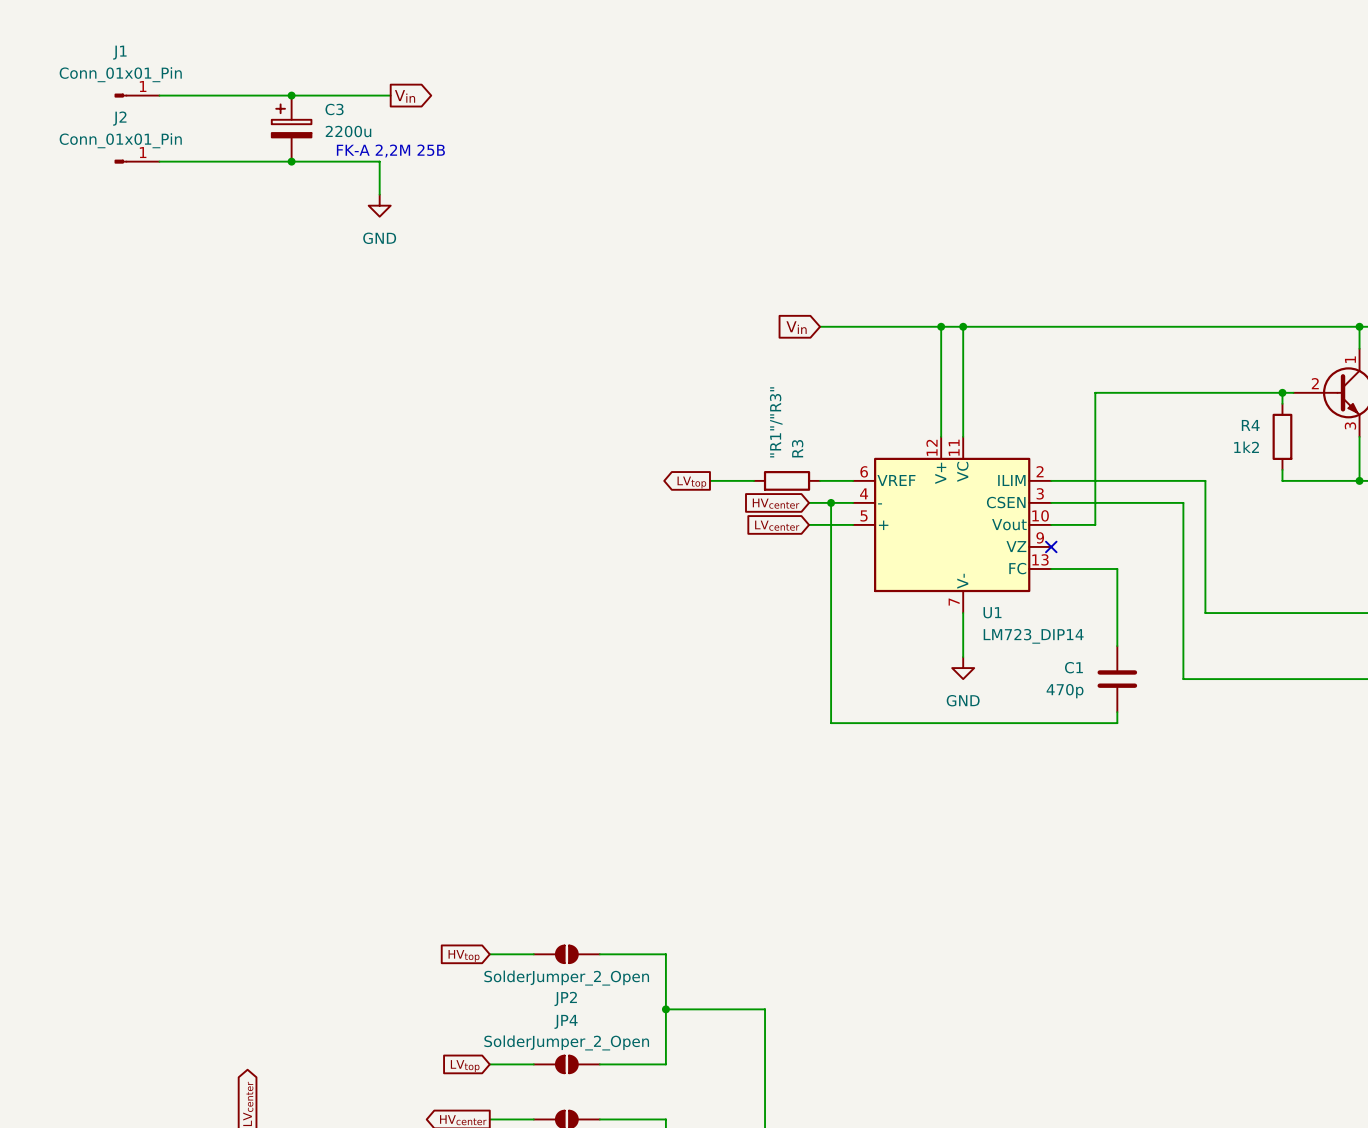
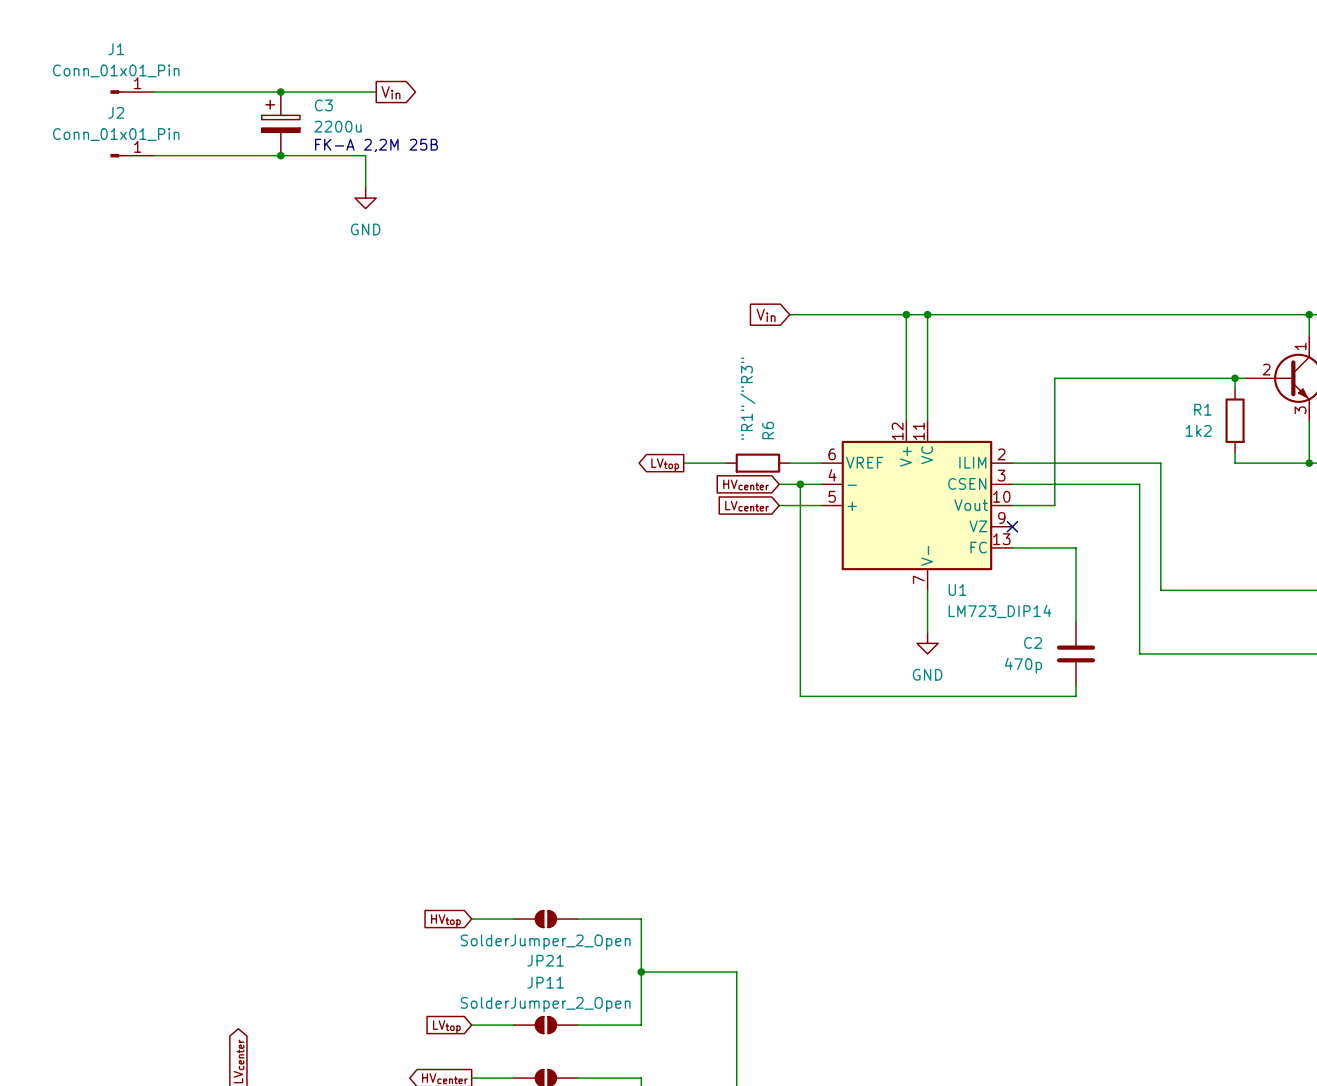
R4 name: R4 (1250, 425) -> R1 (1202, 409)
R3 name: R3 (797, 448) -> R6 (768, 430)
C1 name: C1 (1073, 667) -> C2 (1033, 642)
JP2 name: JP2 (565, 998) -> JP21 (545, 960)
JP4 name: JP4 (566, 1021) -> JP11 (545, 982)

